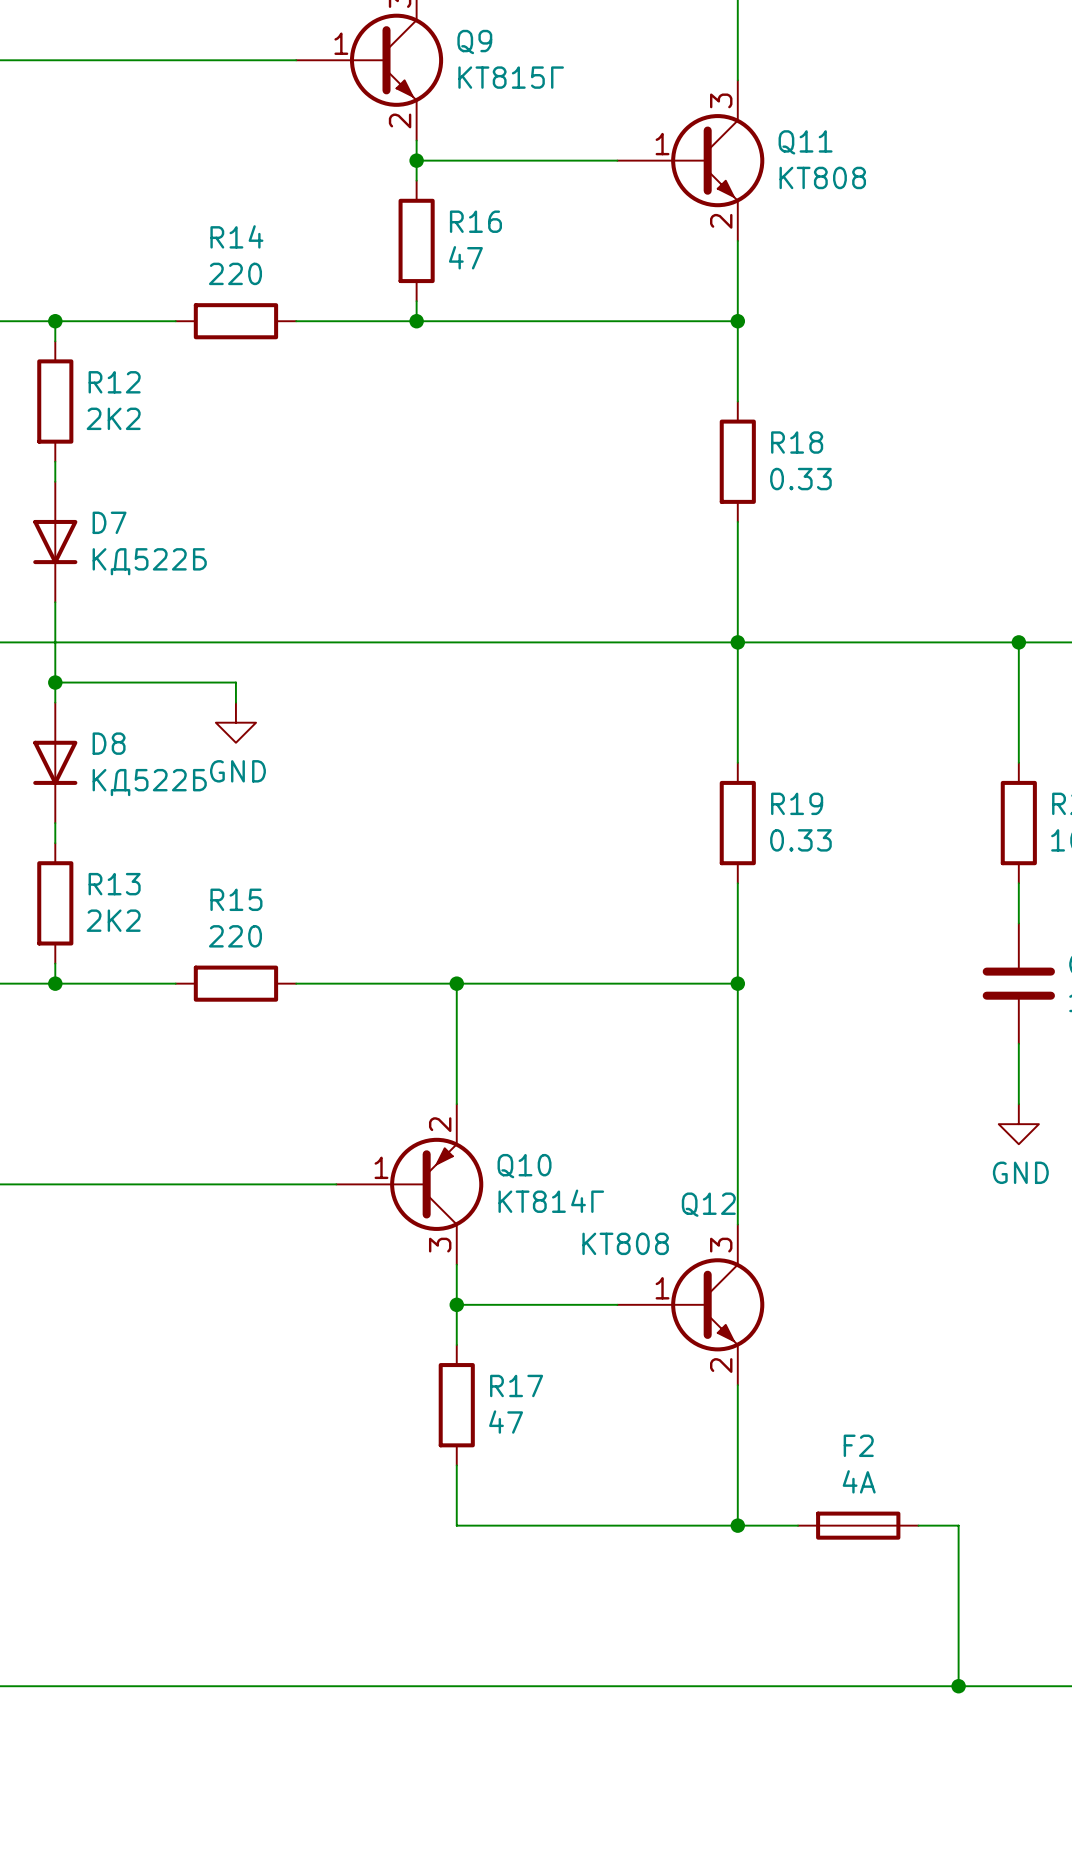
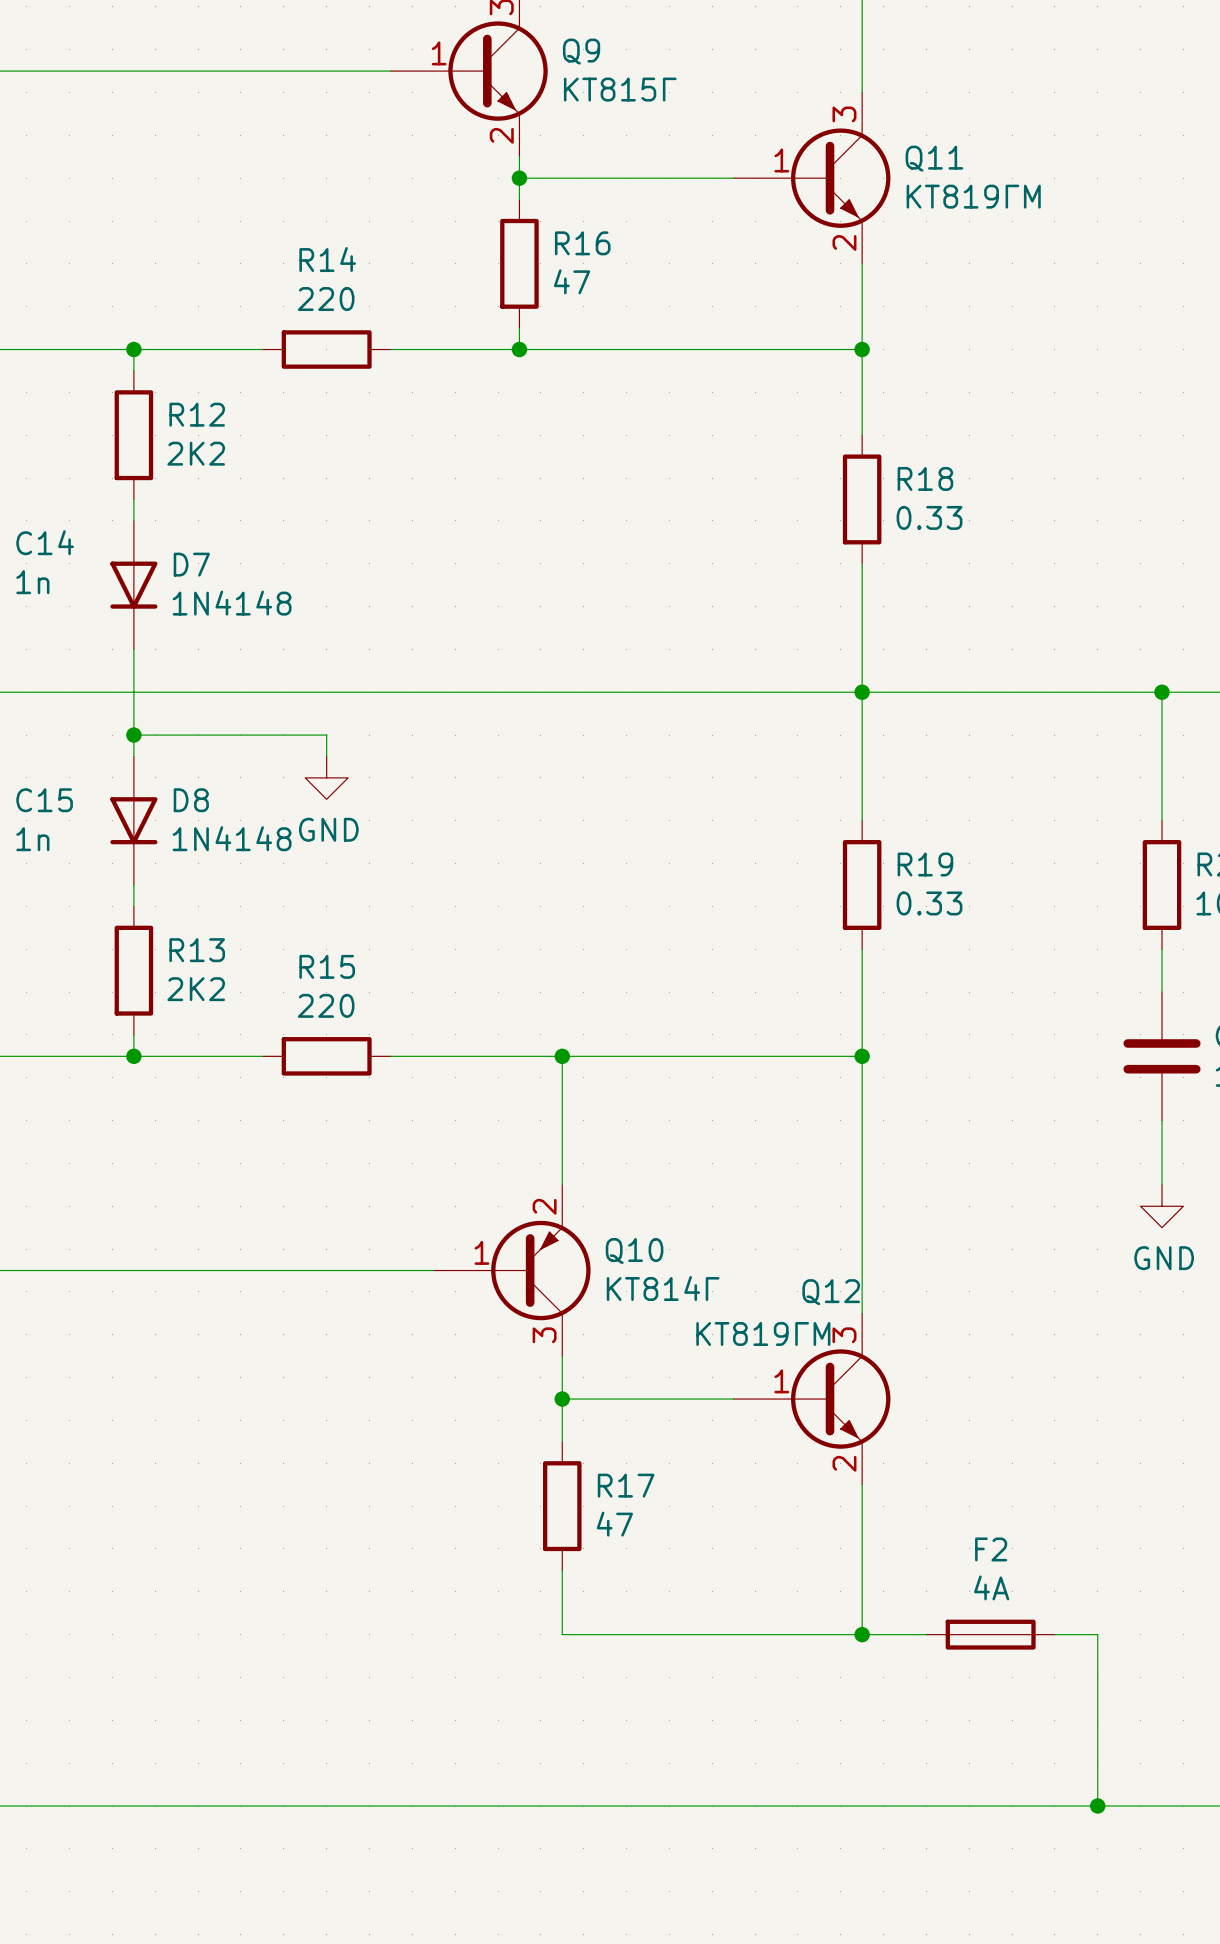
Q11 value: КТ808 (822, 177) -> КТ819ГМ (973, 196)
D7 value: КД522Б (149, 561) -> 1N4148 (232, 603)
D8 value: КД522Б (149, 782) -> 1N4148 (232, 838)
Q12 value: КТ808 (625, 1243) -> КТ819ГМ (763, 1333)

